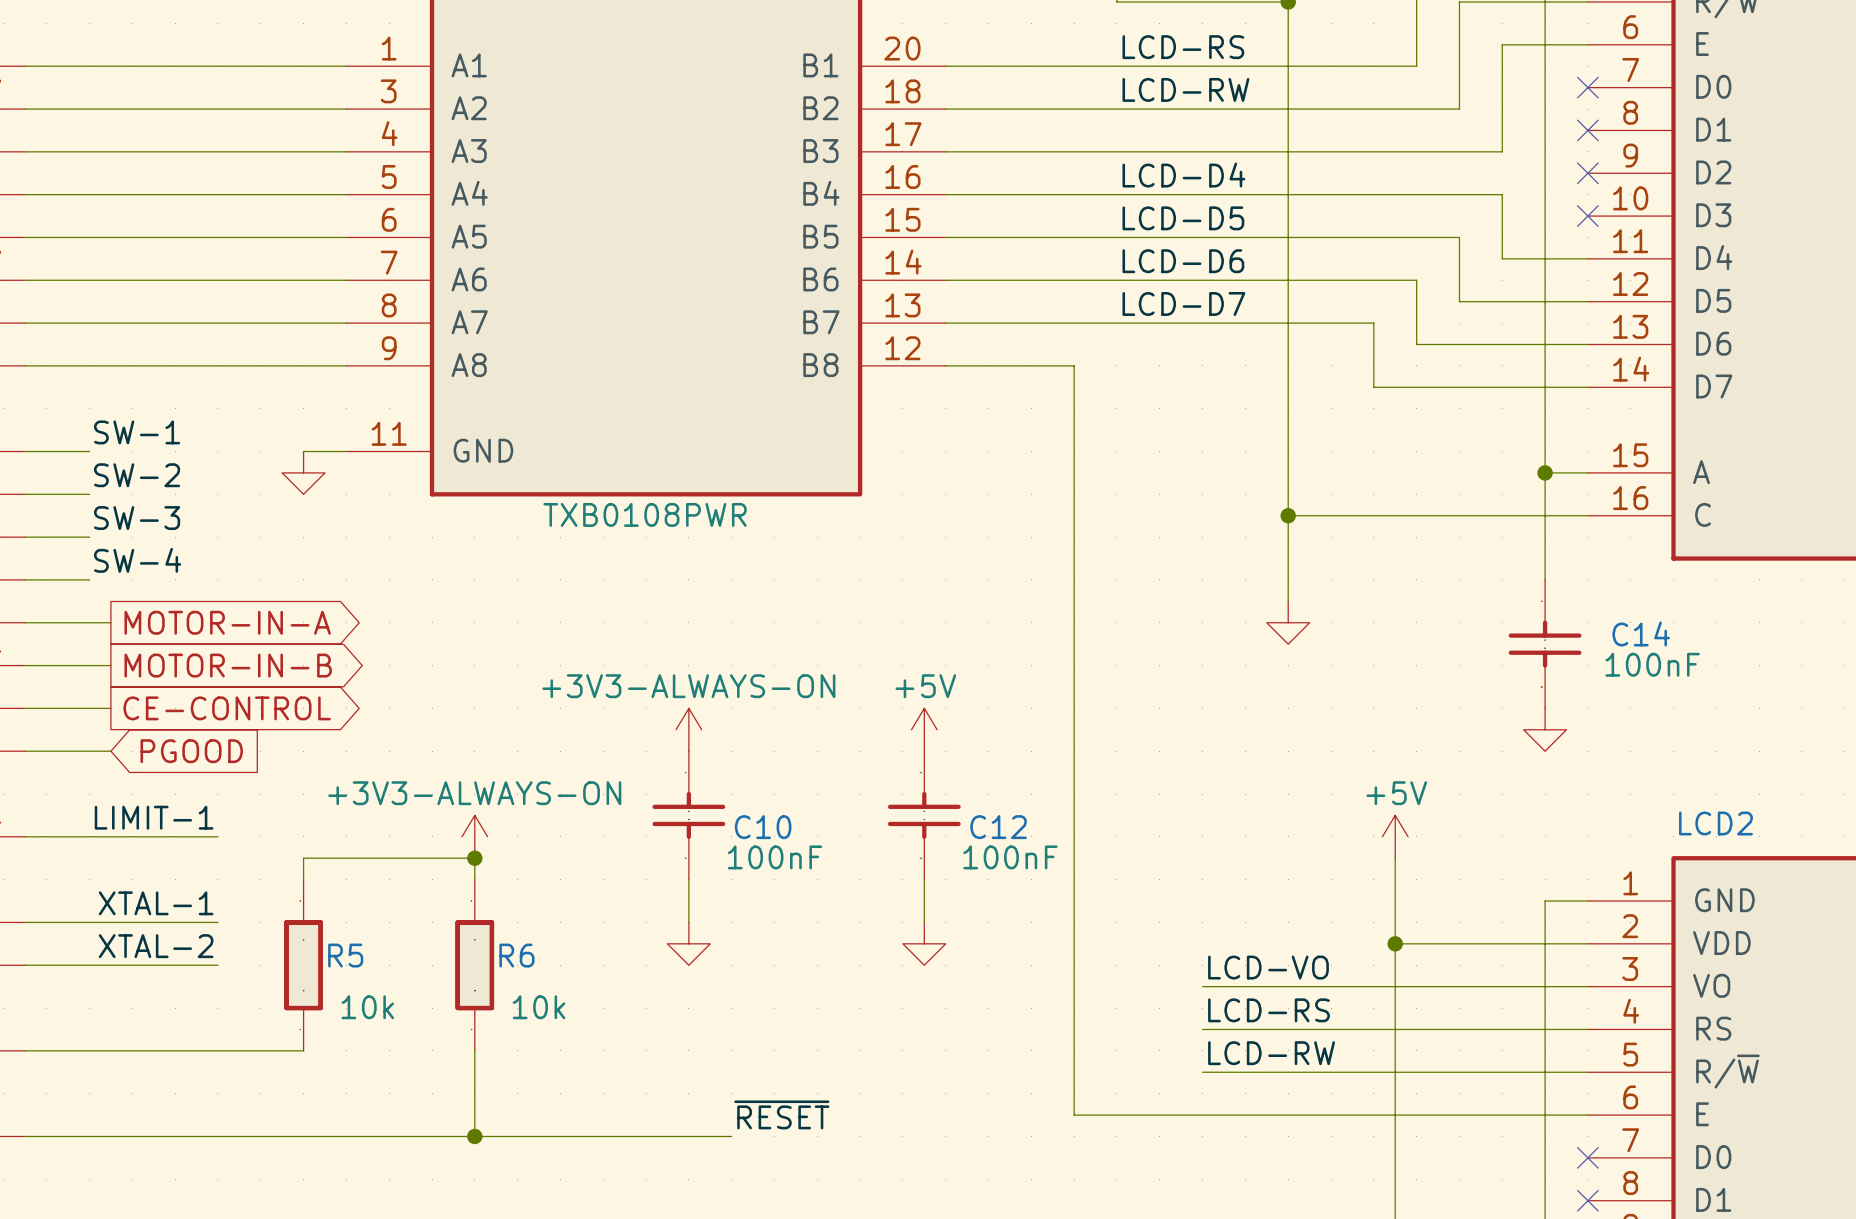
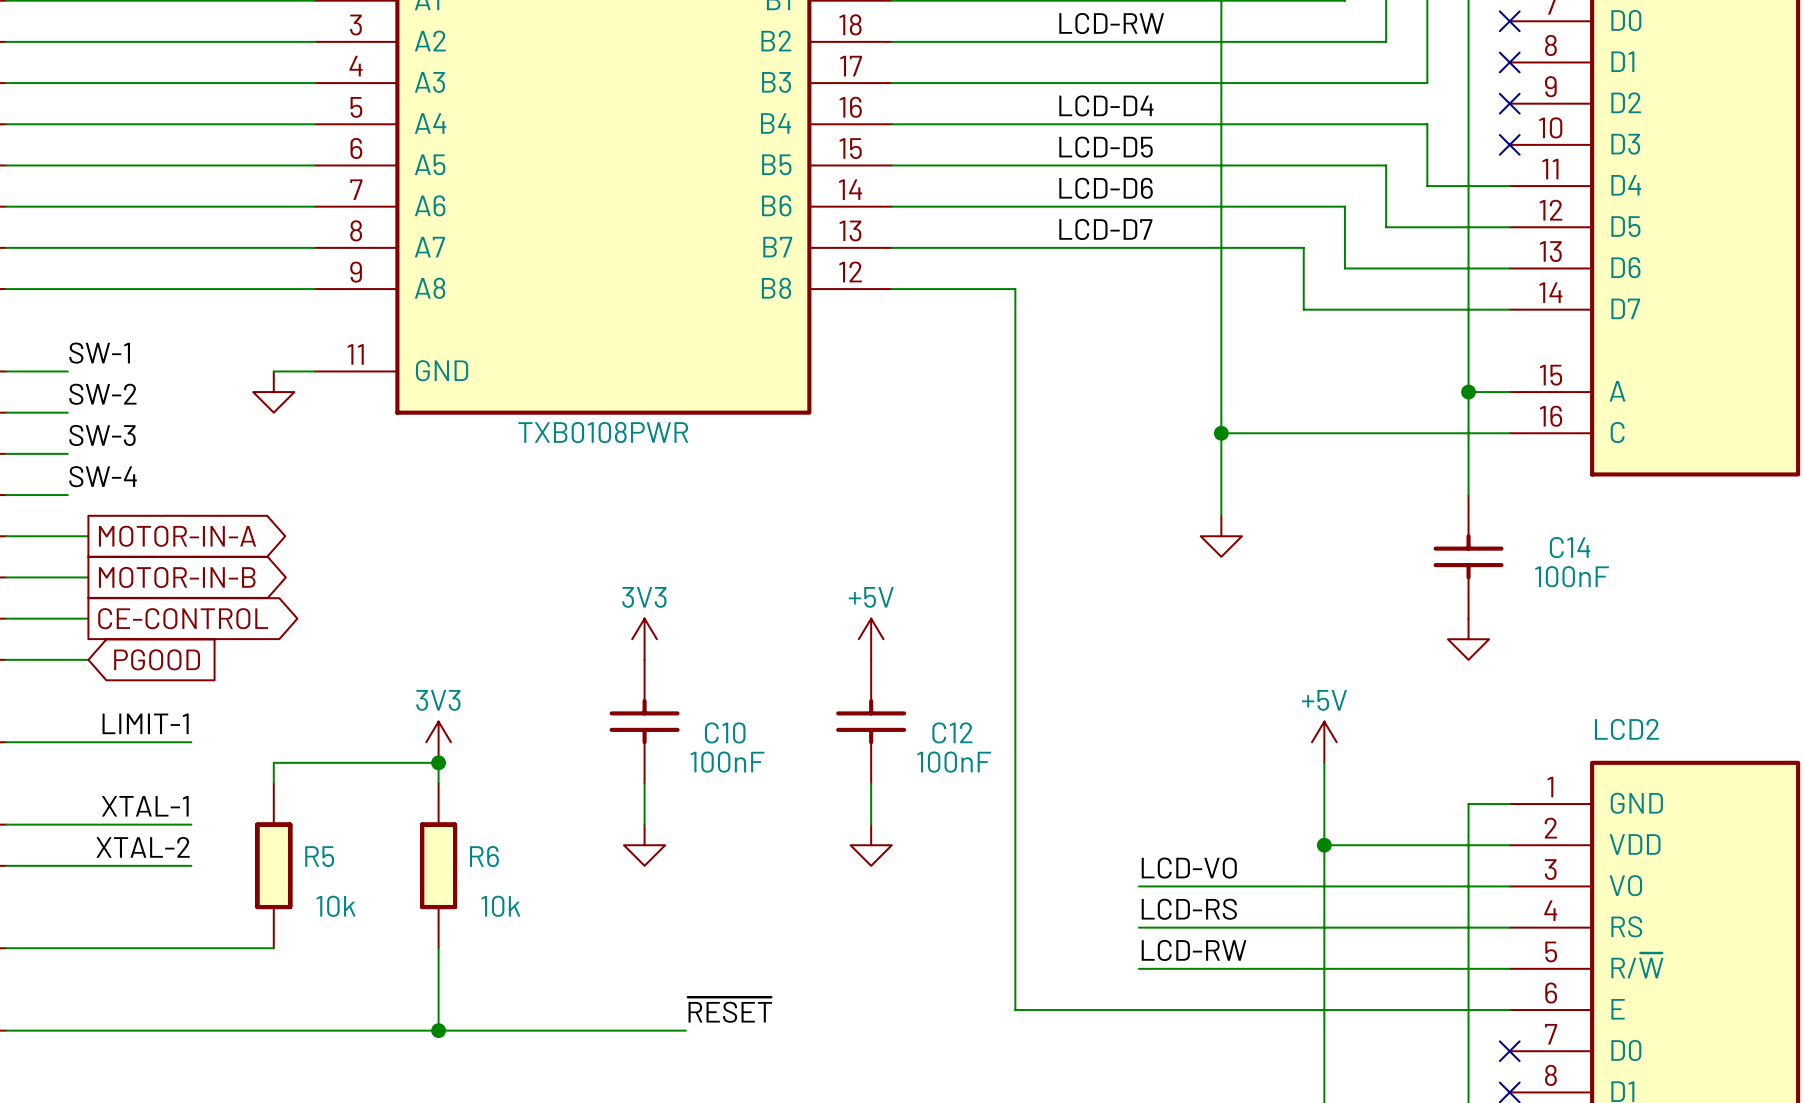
power symbol: +3V3-ALWAYS-ON (688, 729) -> 3V3 (644, 639)
power symbol: +3V3-ALWAYS-ON (474, 836) -> 3V3 (438, 742)

